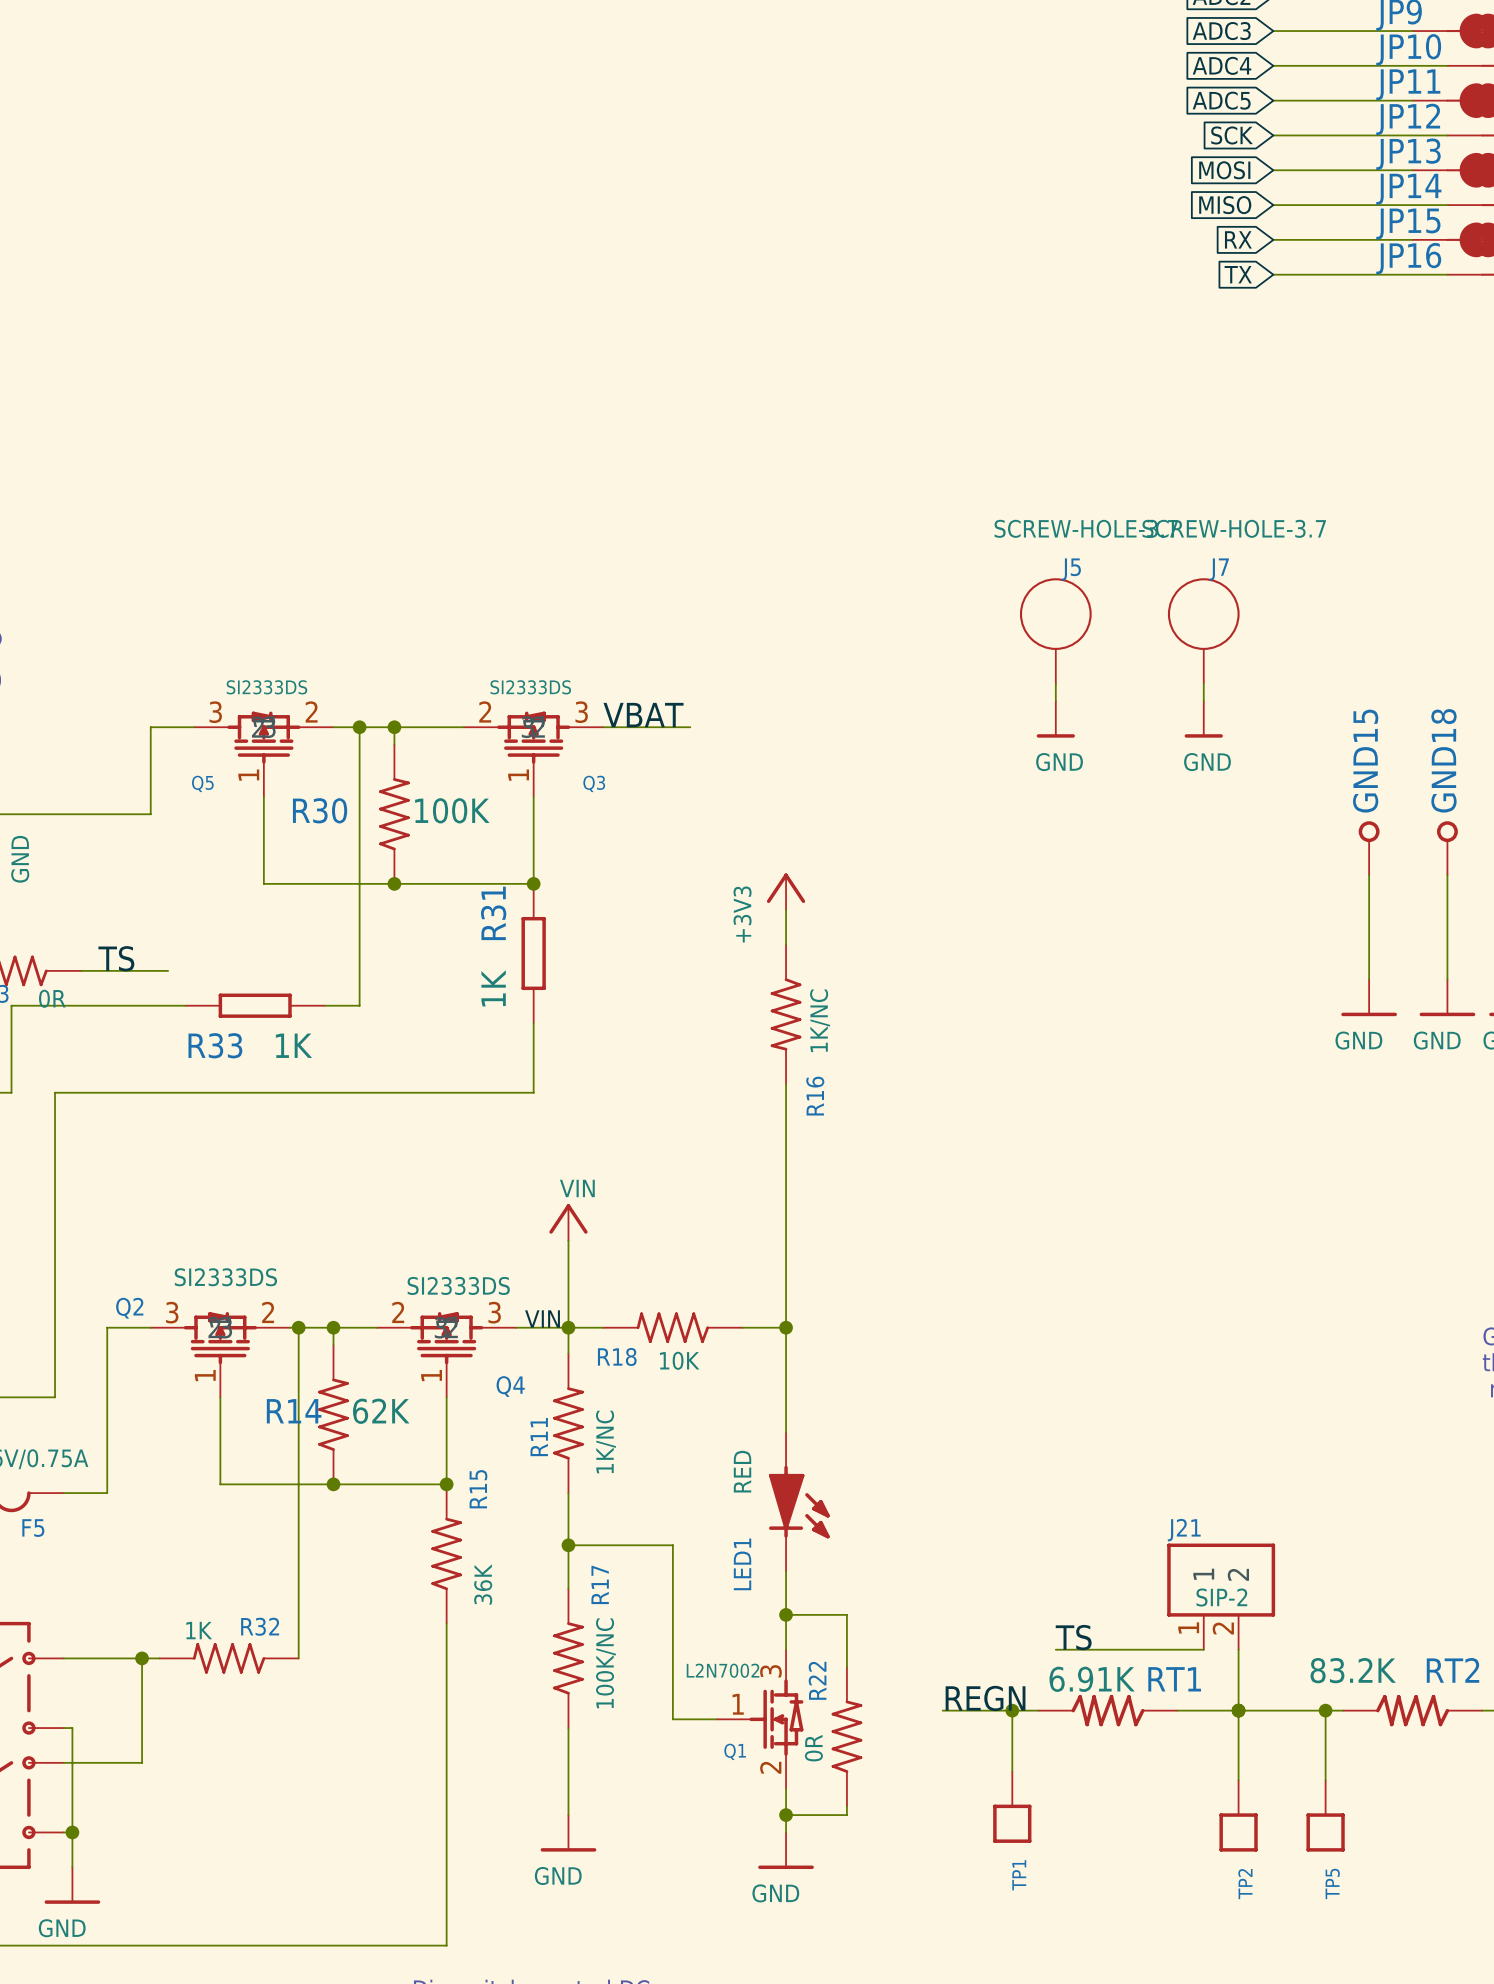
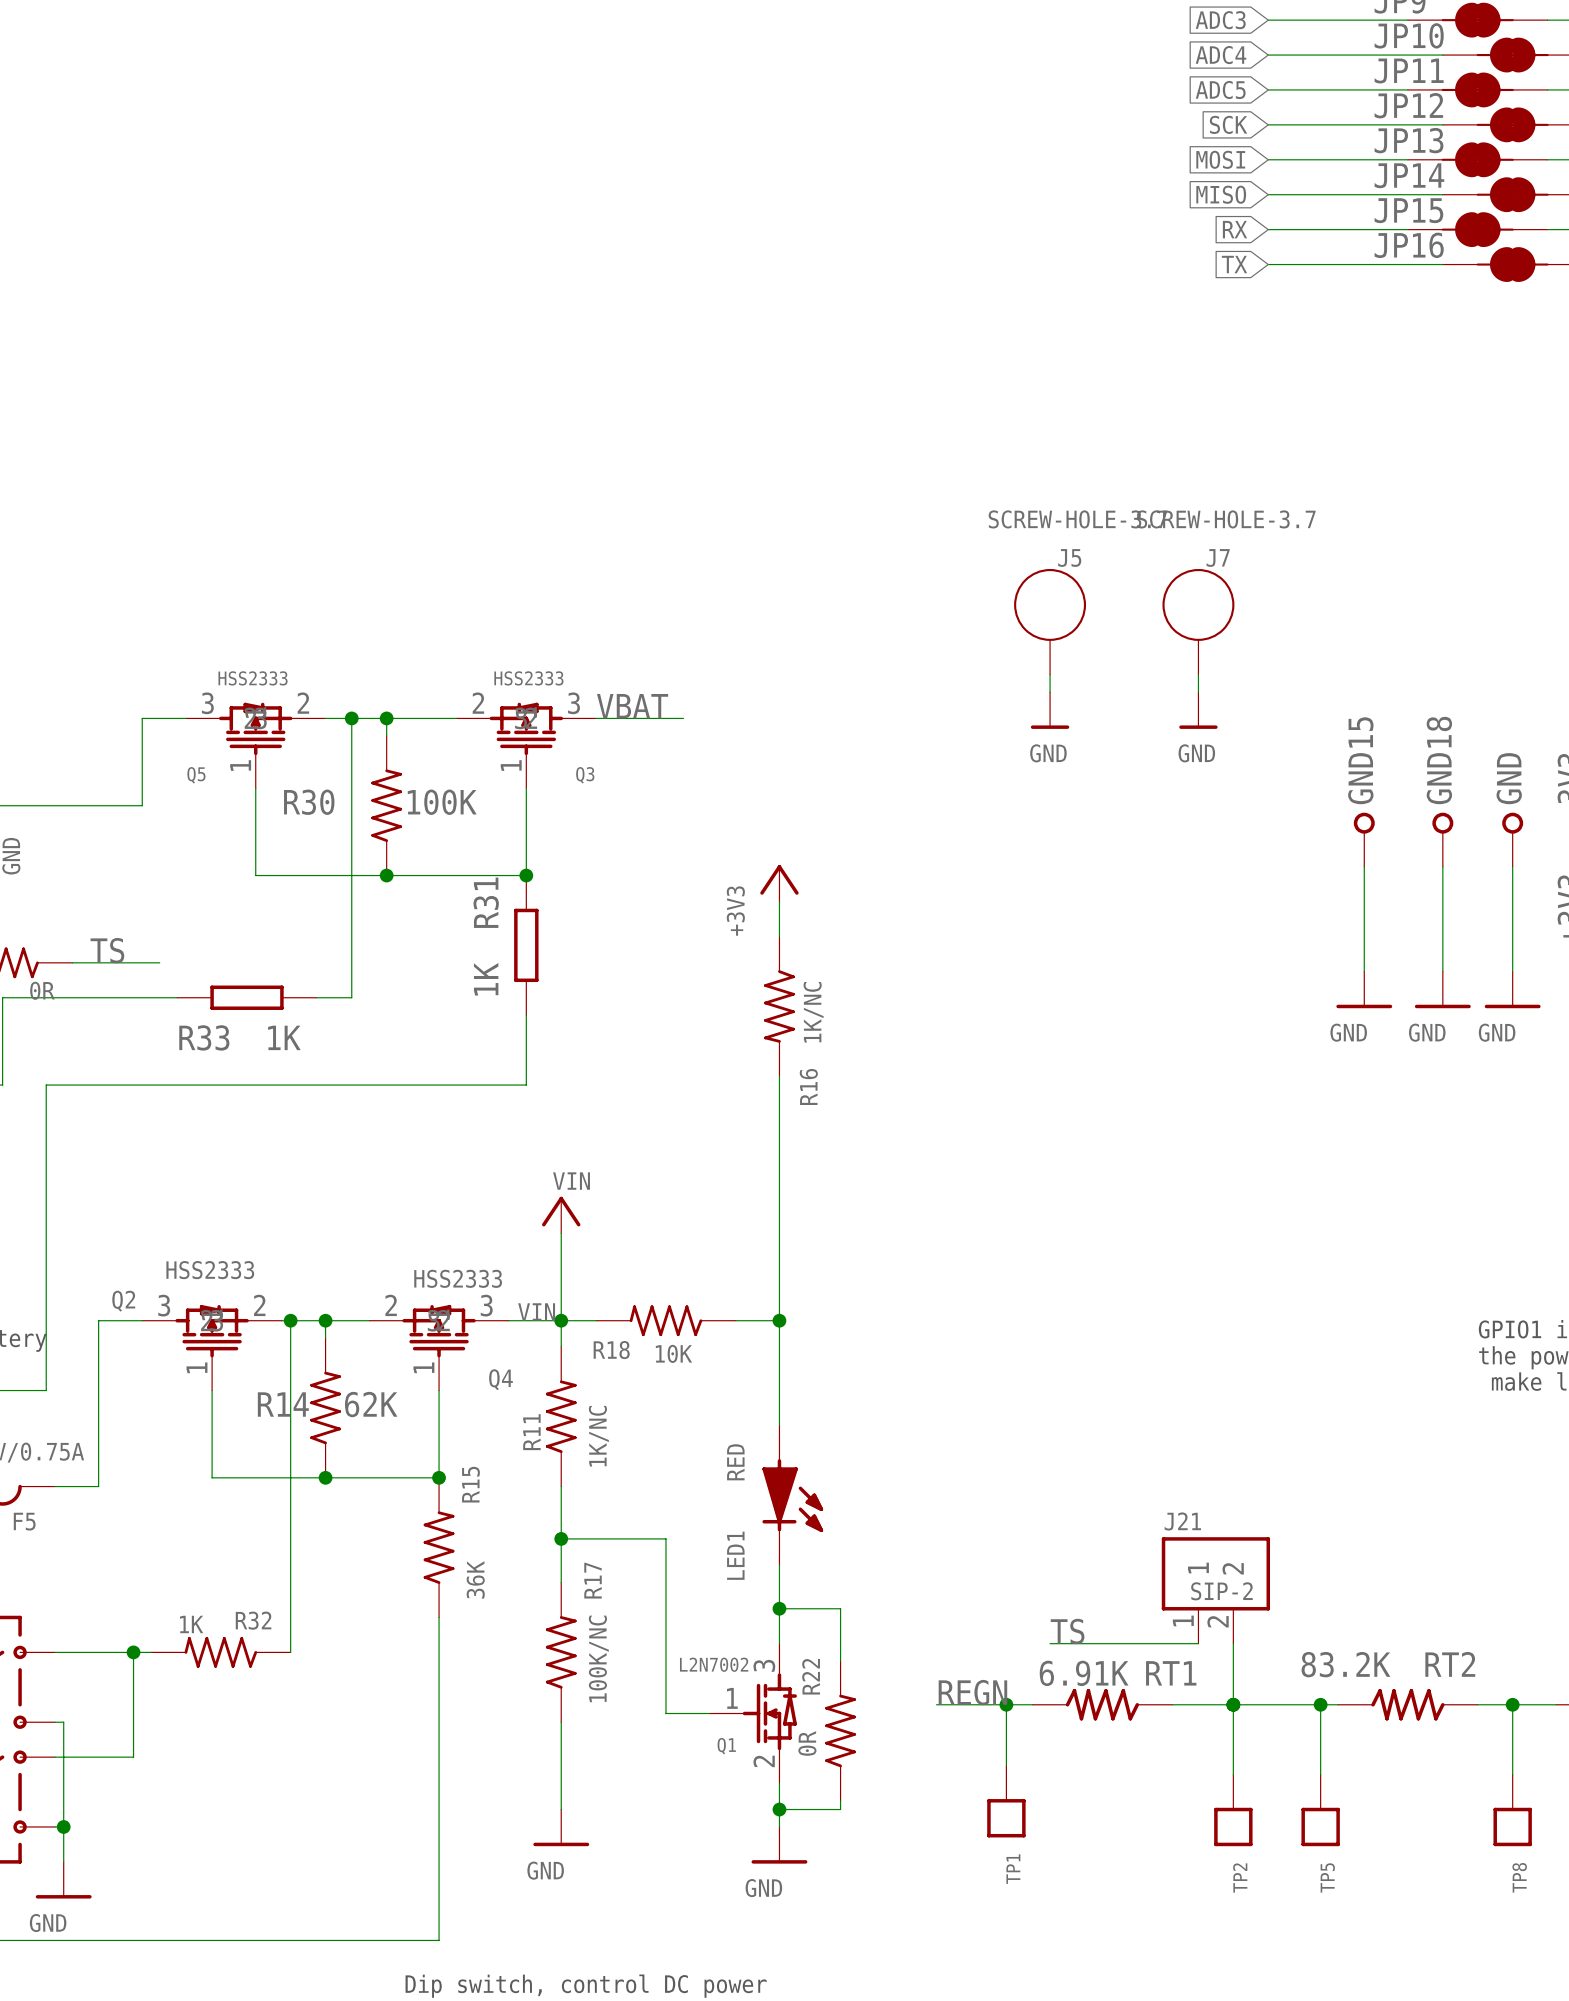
Q5 value: SI2333DS (266, 687) -> HSS2333 (253, 678)
Q3 value: SI2333DS (530, 687) -> HSS2333 (528, 678)
Q2 value: SI2333DS (225, 1277) -> HSS2333 (210, 1270)
Q4 value: SI2333DS (458, 1285) -> HSS2333 (458, 1278)

